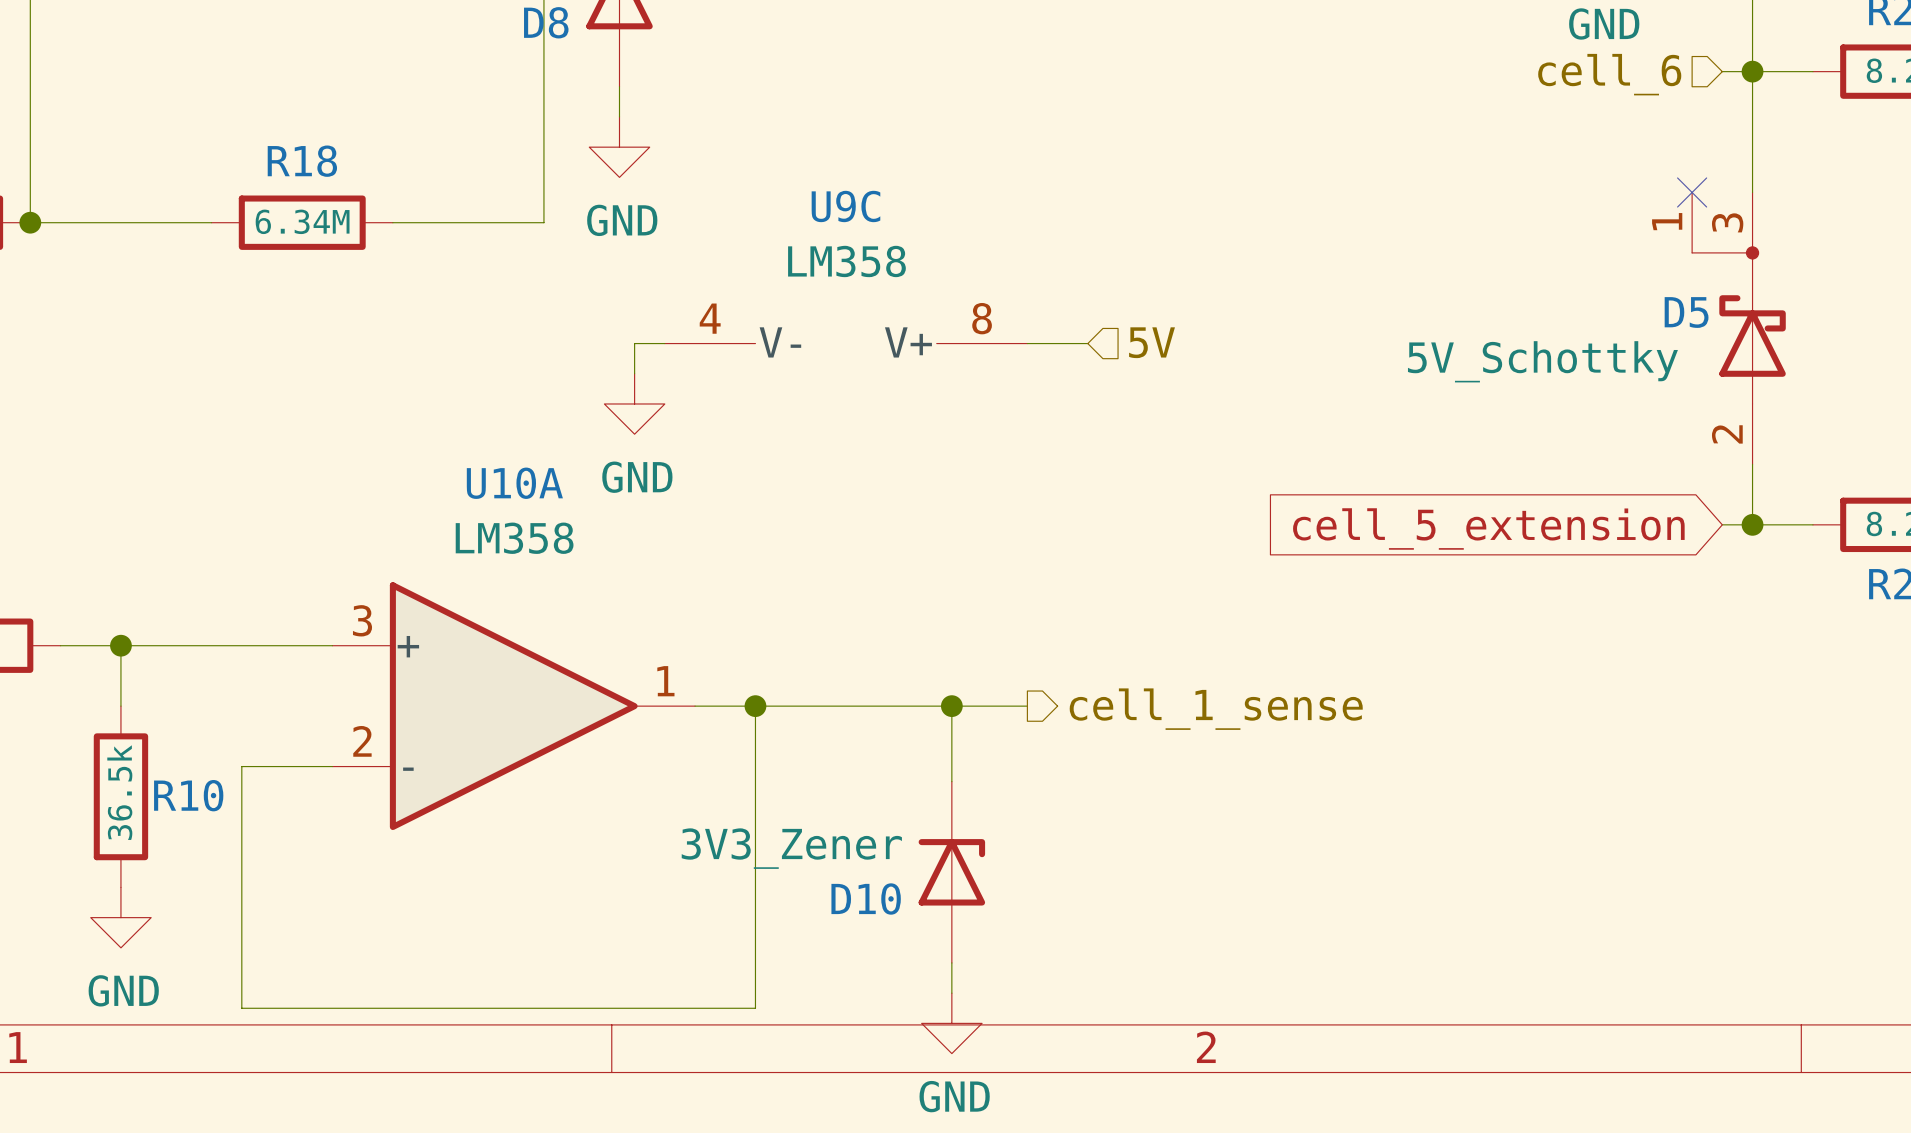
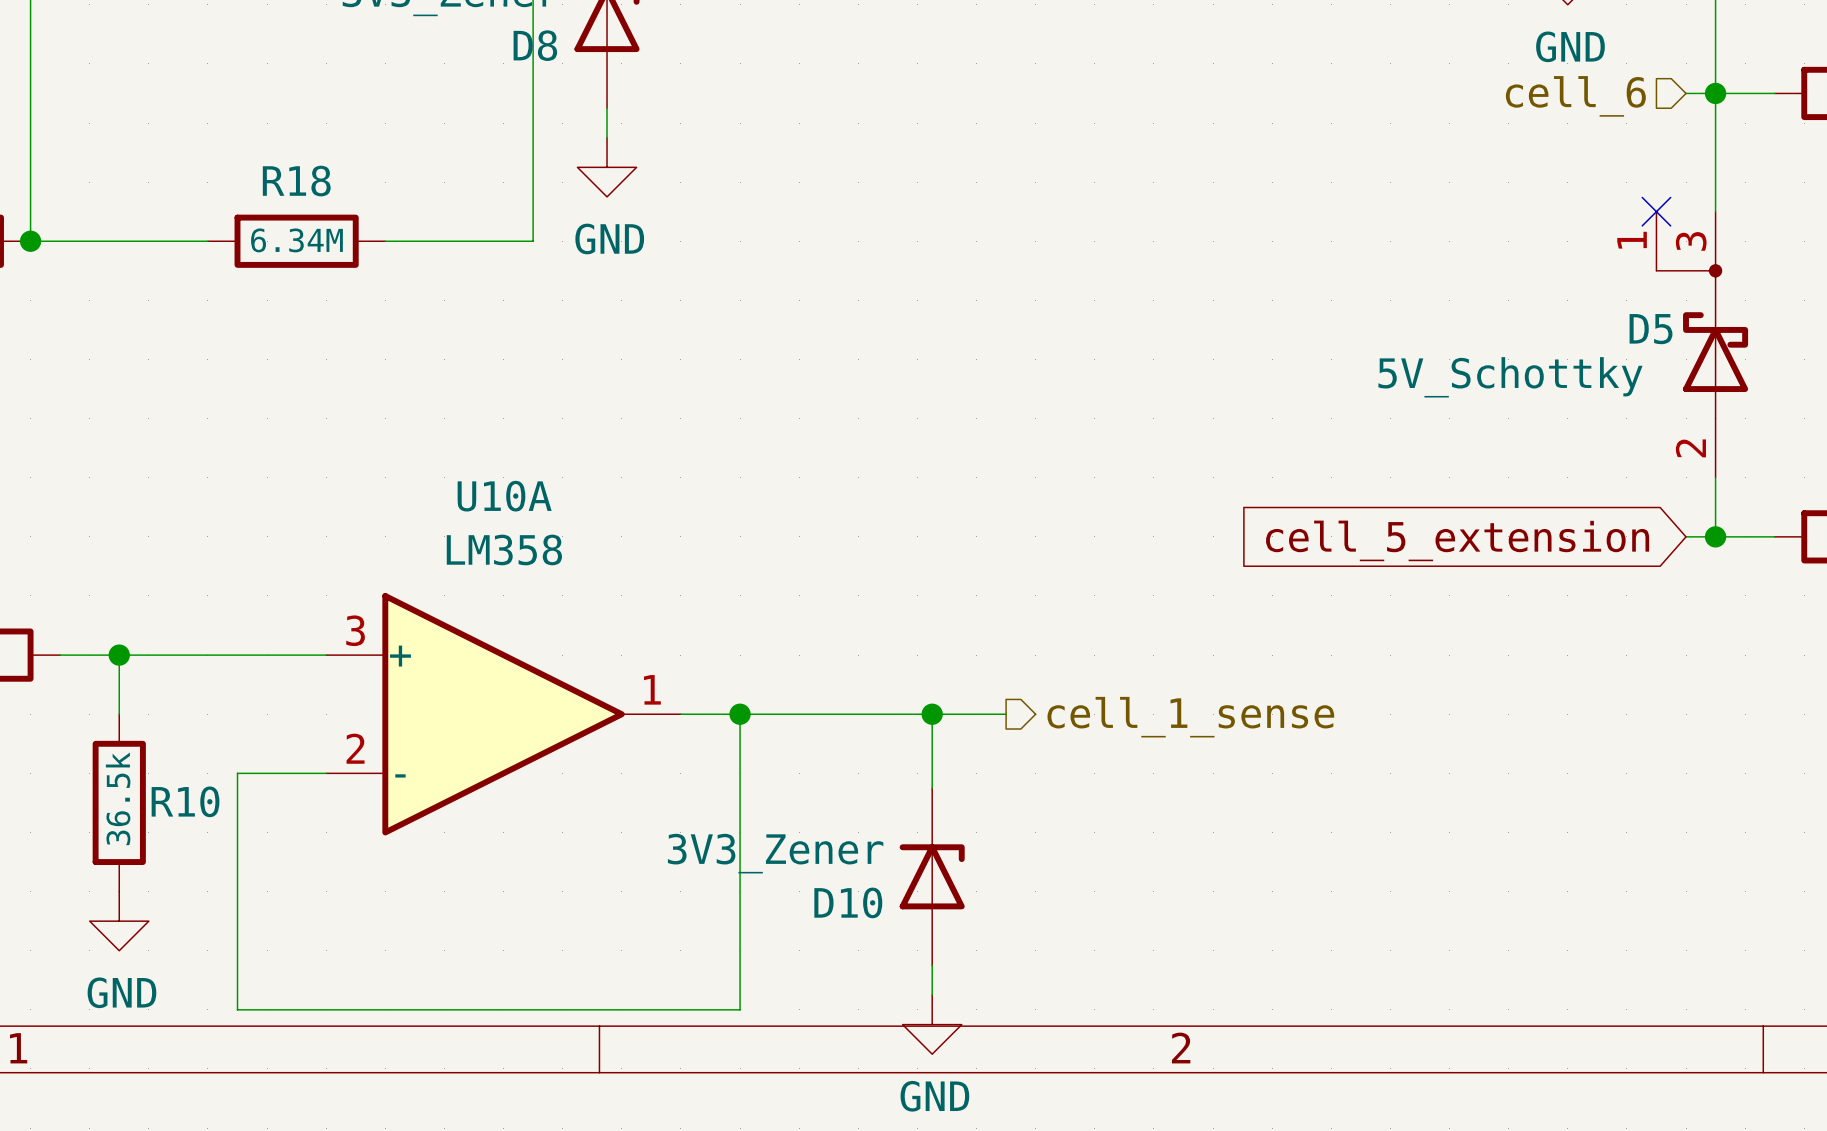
hierarchical label: 5V (1152, 342) -> none
wire: (664, 343) (634, 343) (634, 373) -> none
U9C: LM358 (846, 343) -> none
wire: (1027, 343) (1087, 343) -> none
power symbol: GND (634, 403) -> none

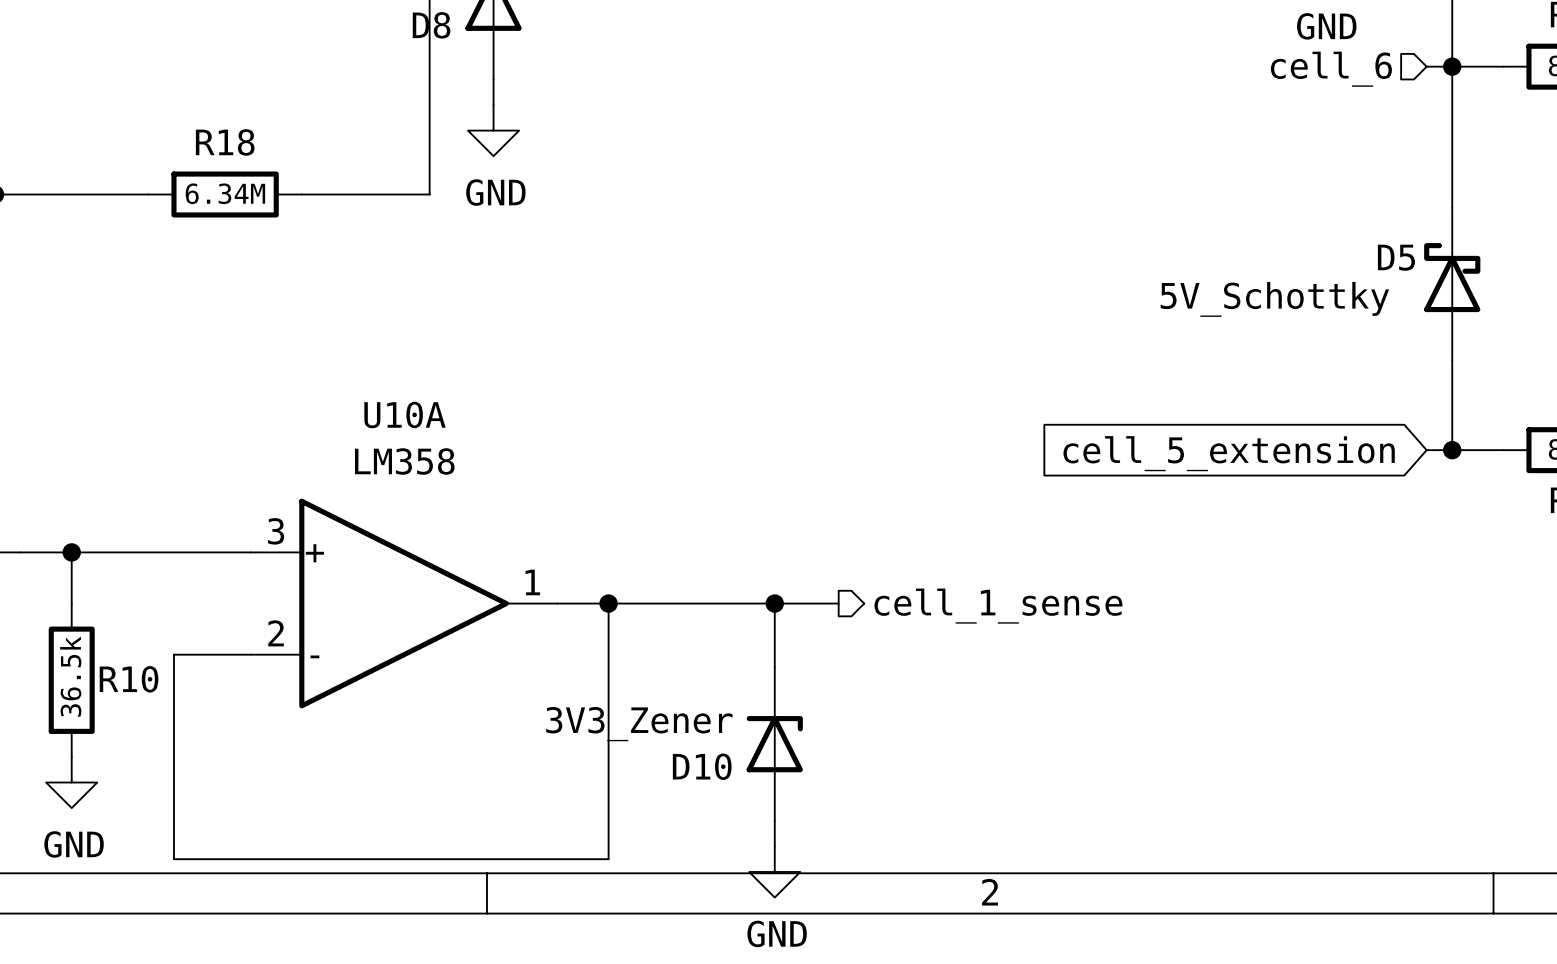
D5 symbol: [1656, 211, 1749, 478] -> [1424, 207, 1481, 361]
no-connect mark: (1656, 211) -> none

